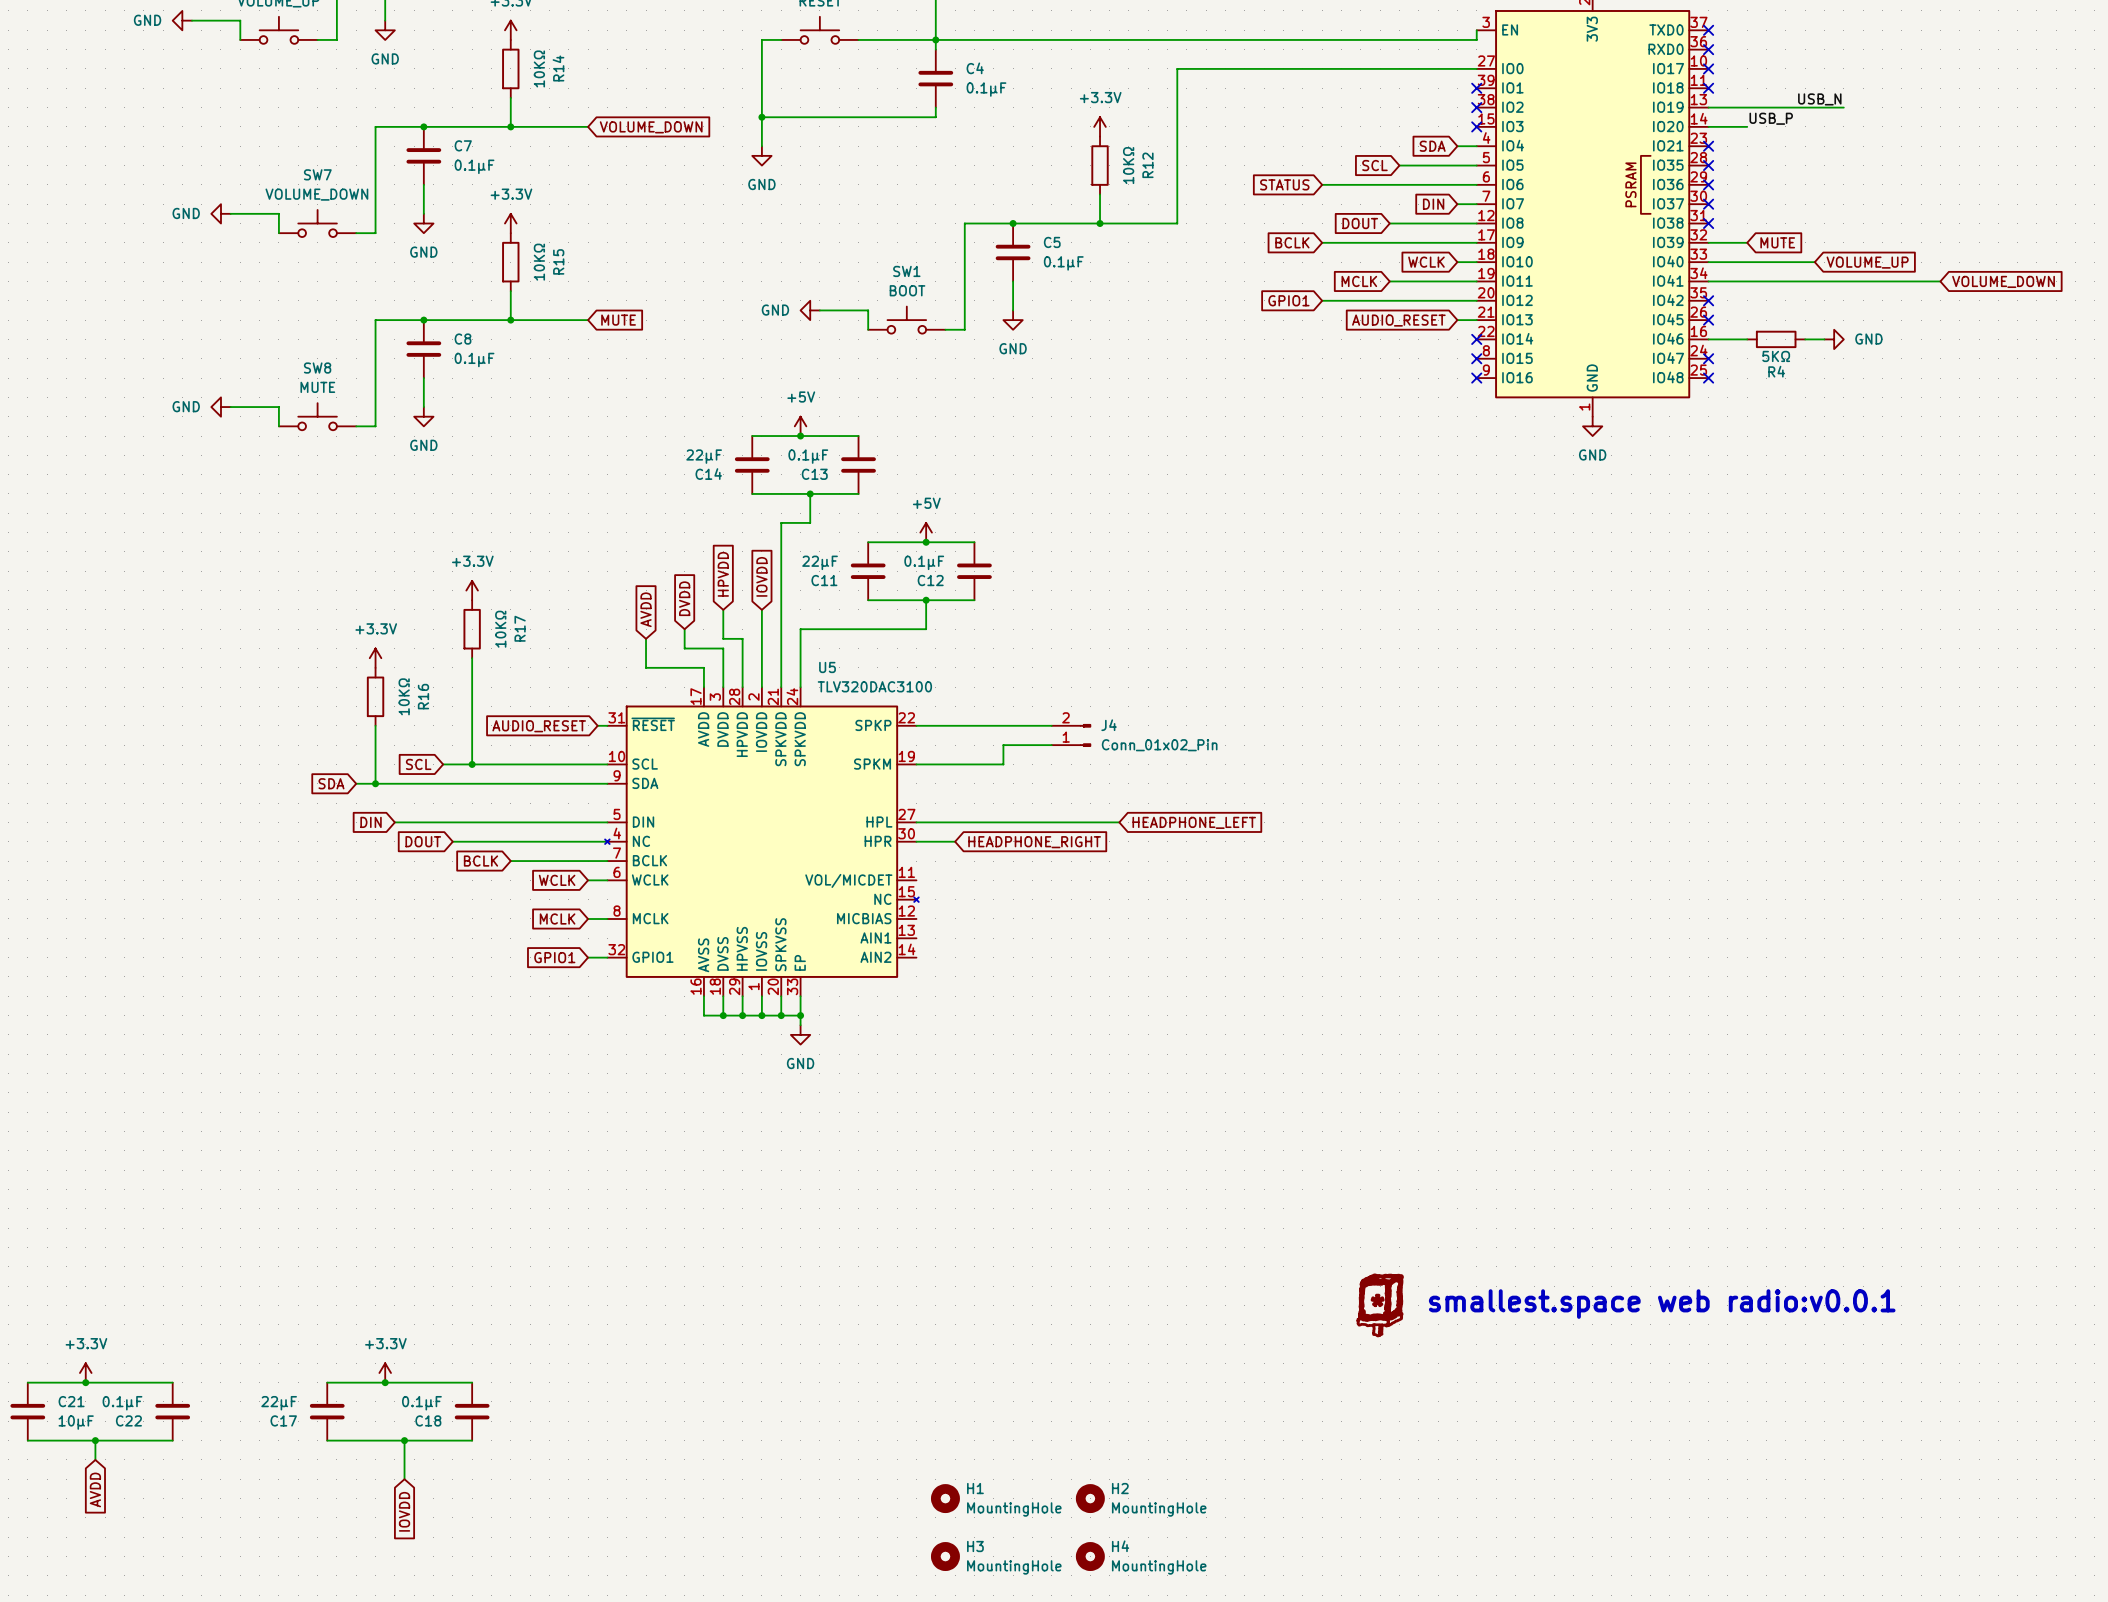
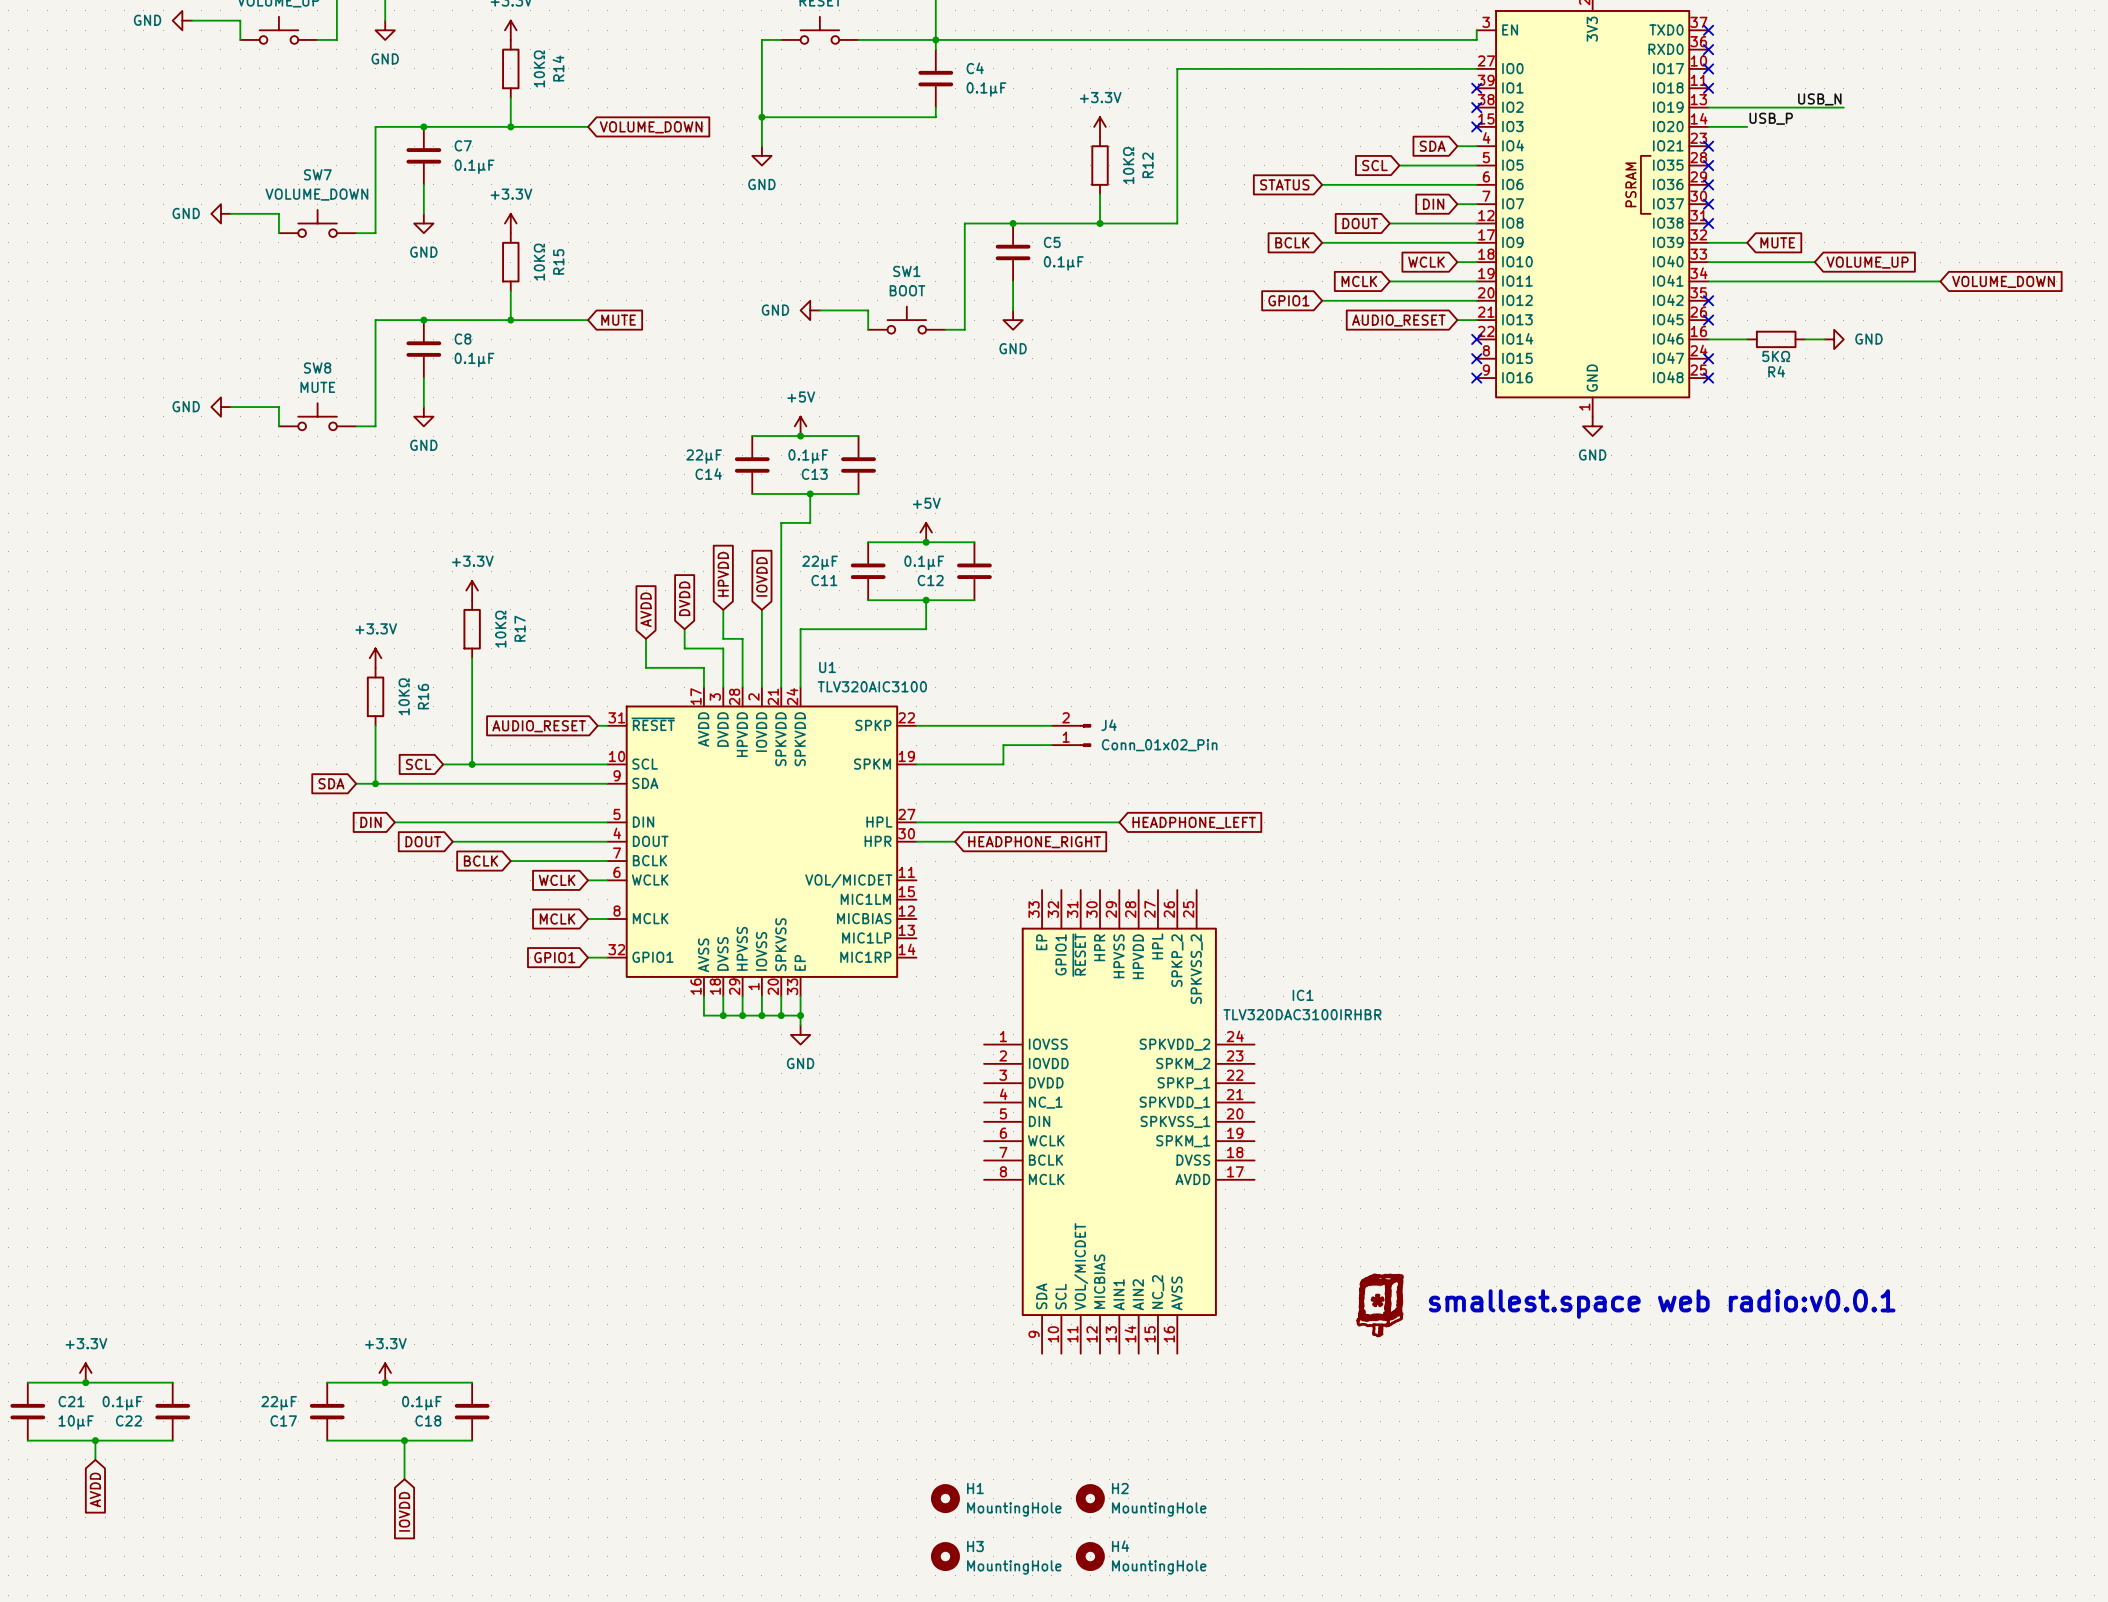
U5: TLV320DAC3100 (761, 841) -> none
U1: none -> TLV320AIC3100 (761, 841)
IC1: none -> TLV320DAC3100IRHBR (1119, 1121)

